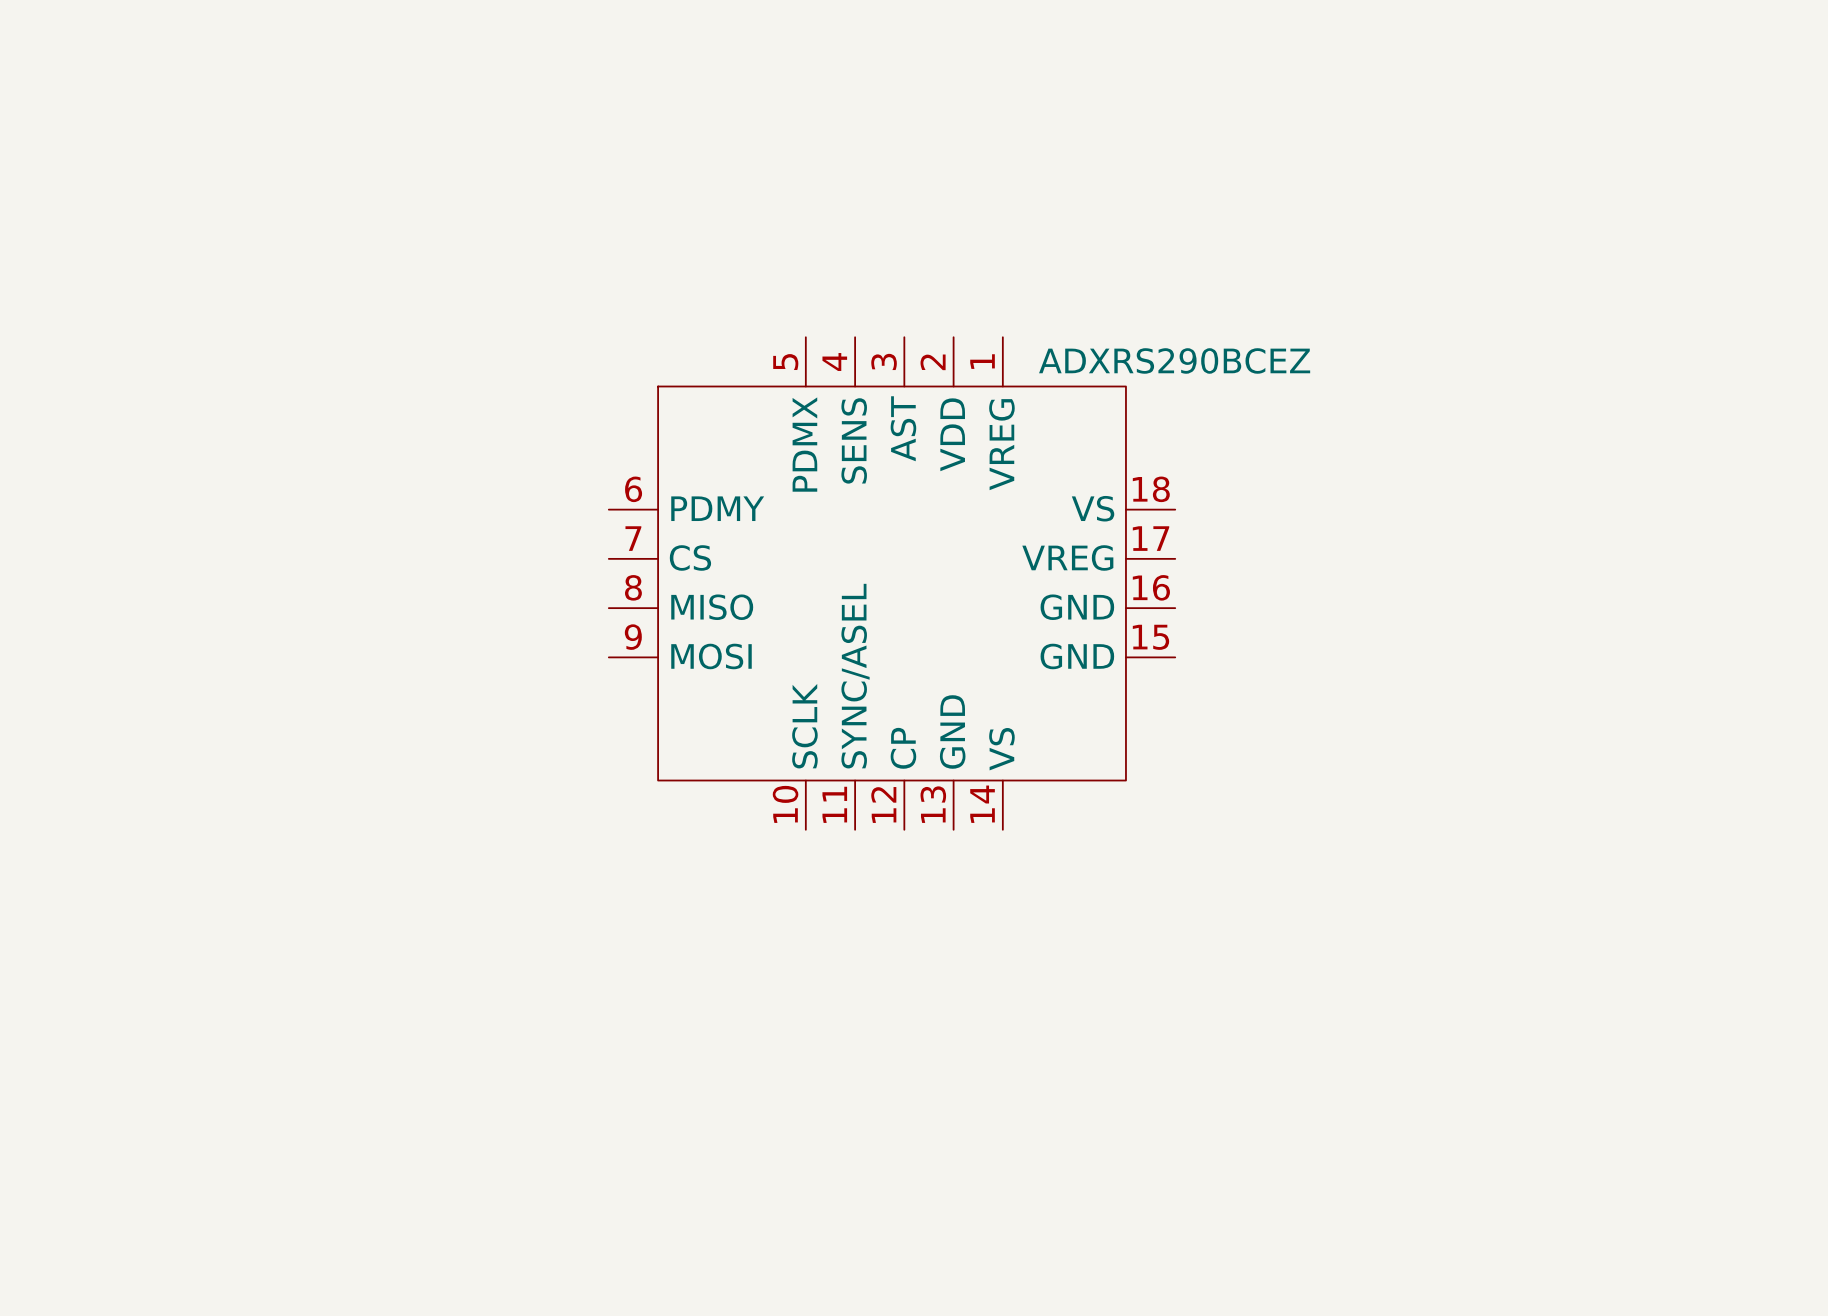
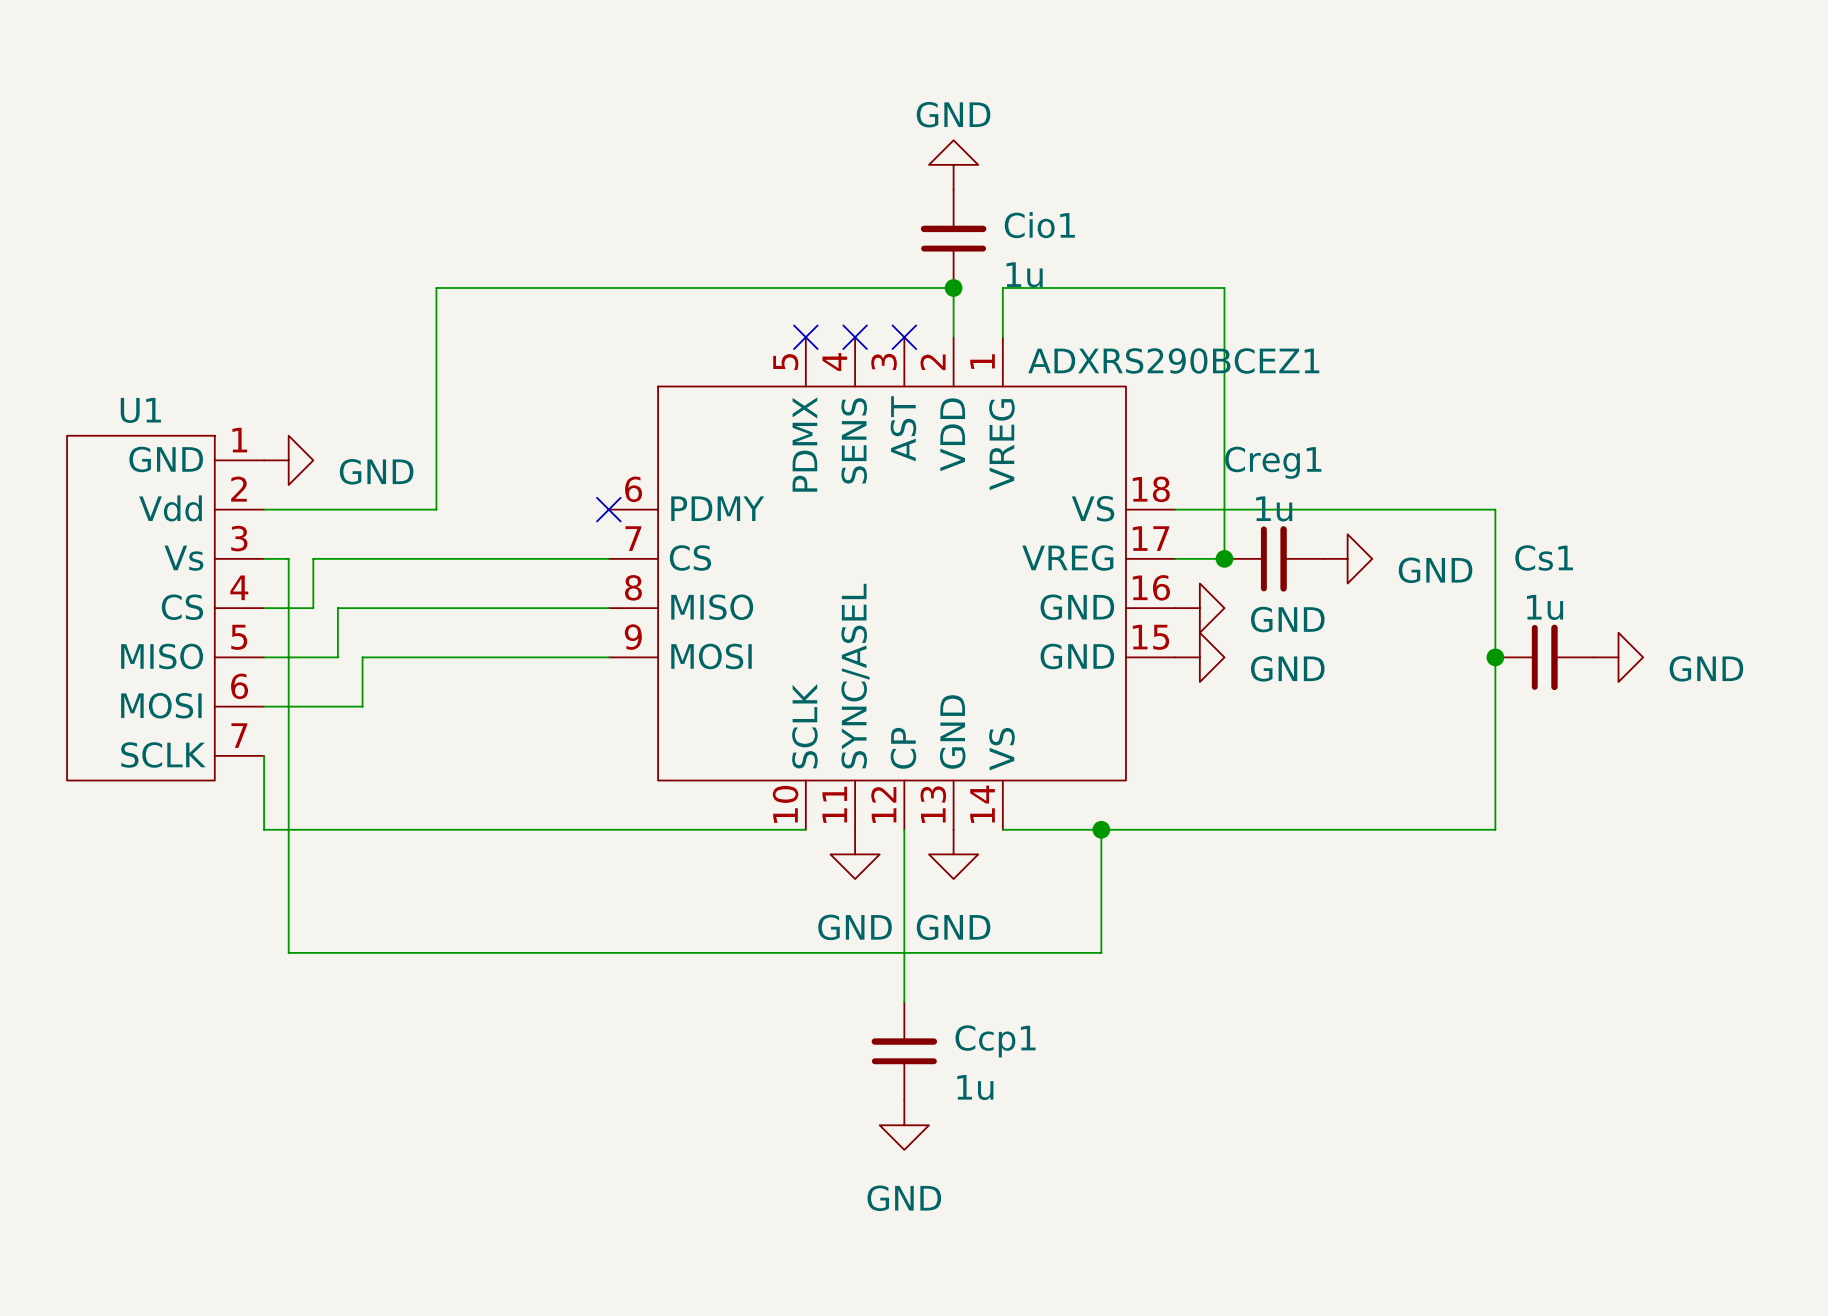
power symbol: none -> GND (953, 164)
Cio1: none -> 1u (953, 238)
junction: none -> (953, 287)
no-connect mark: none -> (805, 337)
no-connect mark: none -> (855, 337)
no-connect mark: none -> (904, 337)
wire: none -> (953, 337) (953, 287) (436, 287) (436, 509) (264, 509)
wire: none -> (1002, 337) (1002, 287) (1224, 287) (1224, 558) (1175, 558)
ADXRS290BCEZ name: ADXRS290BCEZ (1174, 360) -> ADXRS290BCEZ1 (1173, 360)
power symbol: none -> GND (288, 460)
no-connect mark: none -> (608, 509)
wire: none -> (1175, 509) (1495, 509) (1495, 829) (1002, 829)
wire: none -> (264, 558) (288, 558) (288, 952) (1101, 952) (1101, 829)
wire: none -> (608, 558) (313, 558) (313, 608) (264, 608)
junction: none -> (1224, 558)
Creg1: none -> 1u (1273, 558)
power symbol: none -> GND (1347, 558)
U1: none -> (165, 608)
wire: none -> (608, 608) (337, 608) (337, 657) (264, 657)
power symbol: none -> GND (1199, 608)
wire: none -> (608, 657) (362, 657) (362, 706) (264, 706)
power symbol: none -> GND (1199, 657)
junction: none -> (1495, 657)
Cs1: none -> 1u (1544, 657)
power symbol: none -> GND (1618, 657)
wire: none -> (264, 755) (264, 829) (805, 829)
wire: none -> (904, 829) (904, 1002)
junction: none -> (1101, 829)
power symbol: none -> GND (855, 854)
power symbol: none -> GND (953, 854)
Ccp1: none -> 1u (904, 1051)
power symbol: none -> GND (904, 1125)

